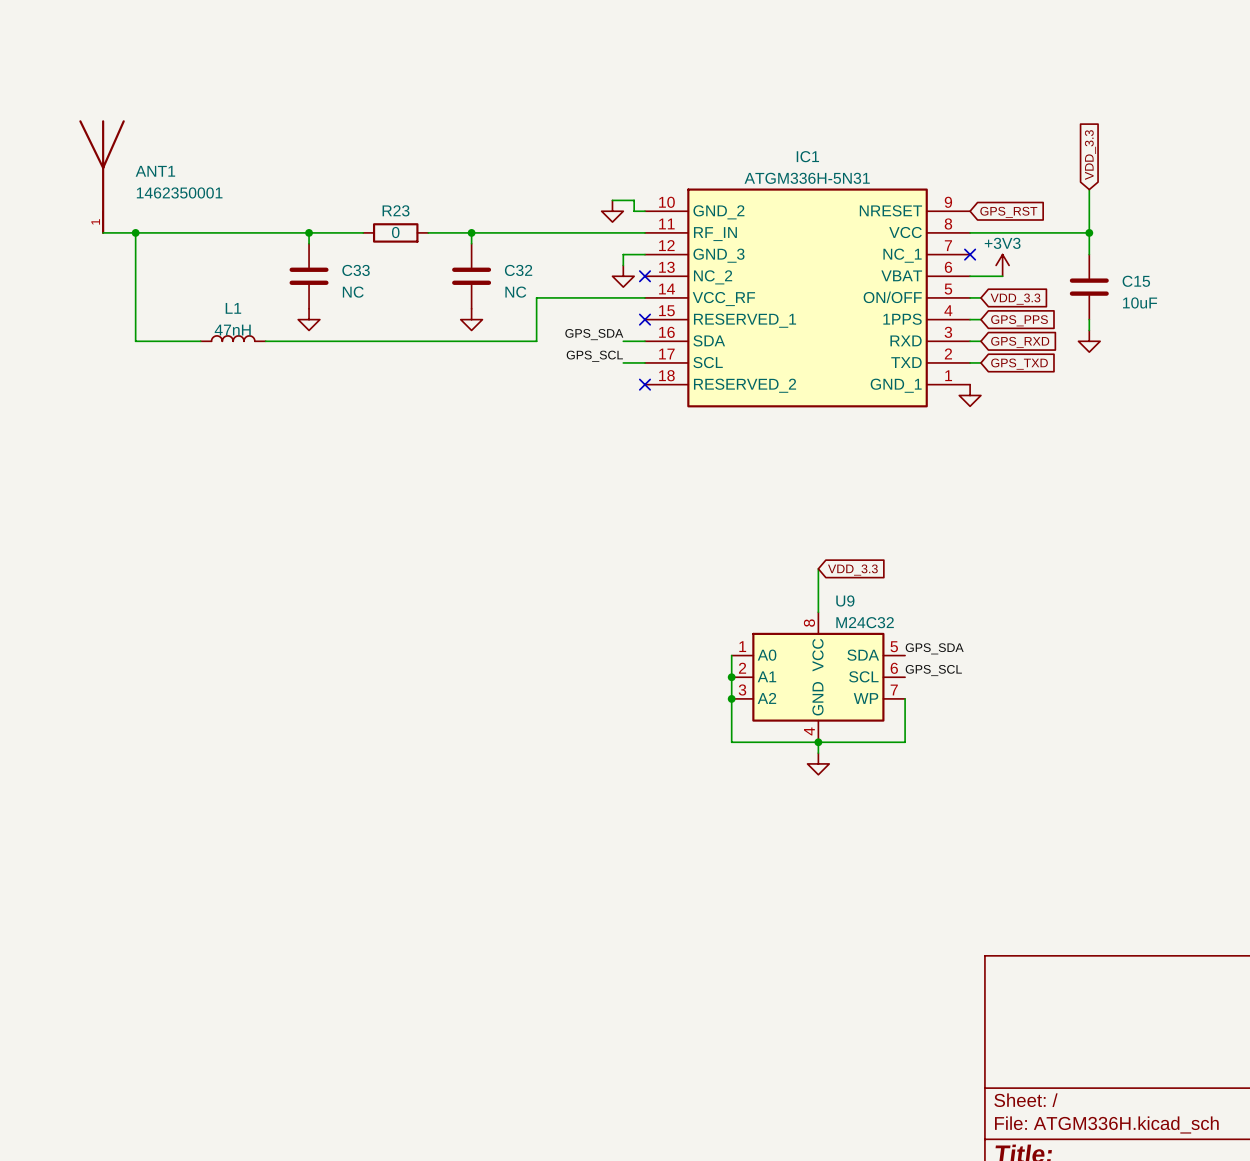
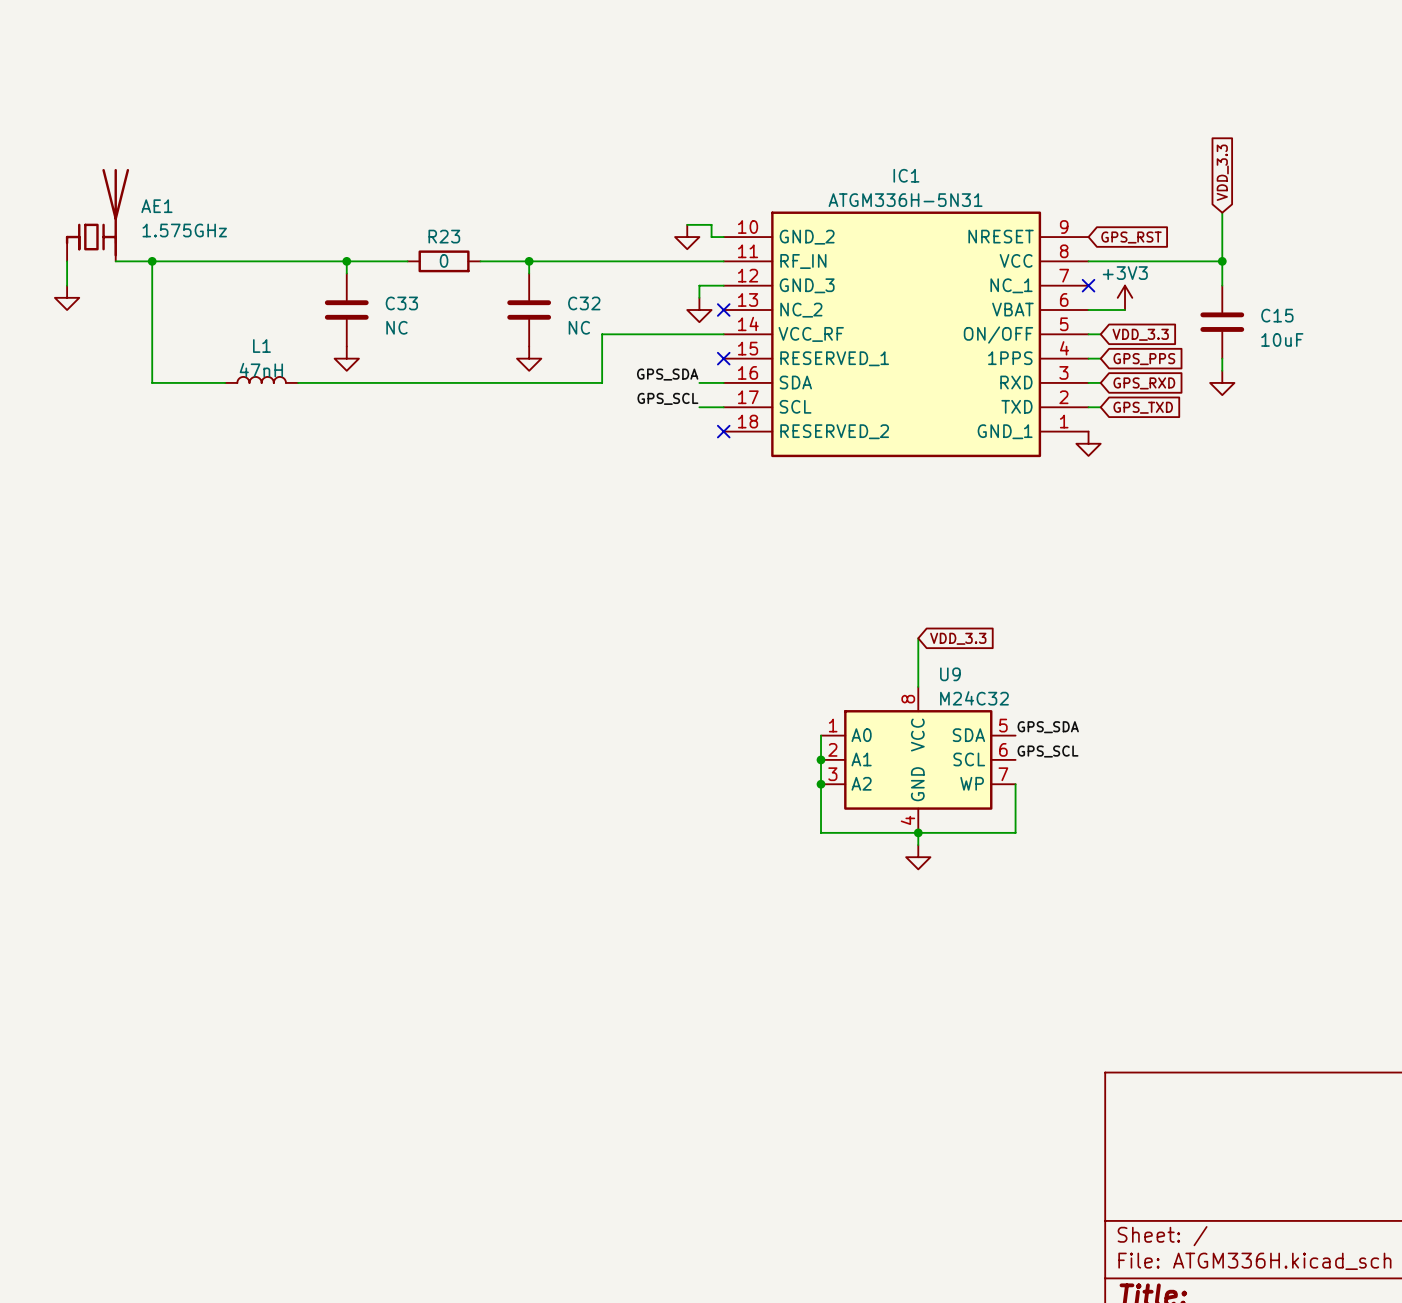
ANT1: 1462350001 (102, 177) -> none
AE1: none -> 1.575GHz (97, 215)
wire: none -> (67, 261) (67, 285)
power symbol: none -> (67, 297)

